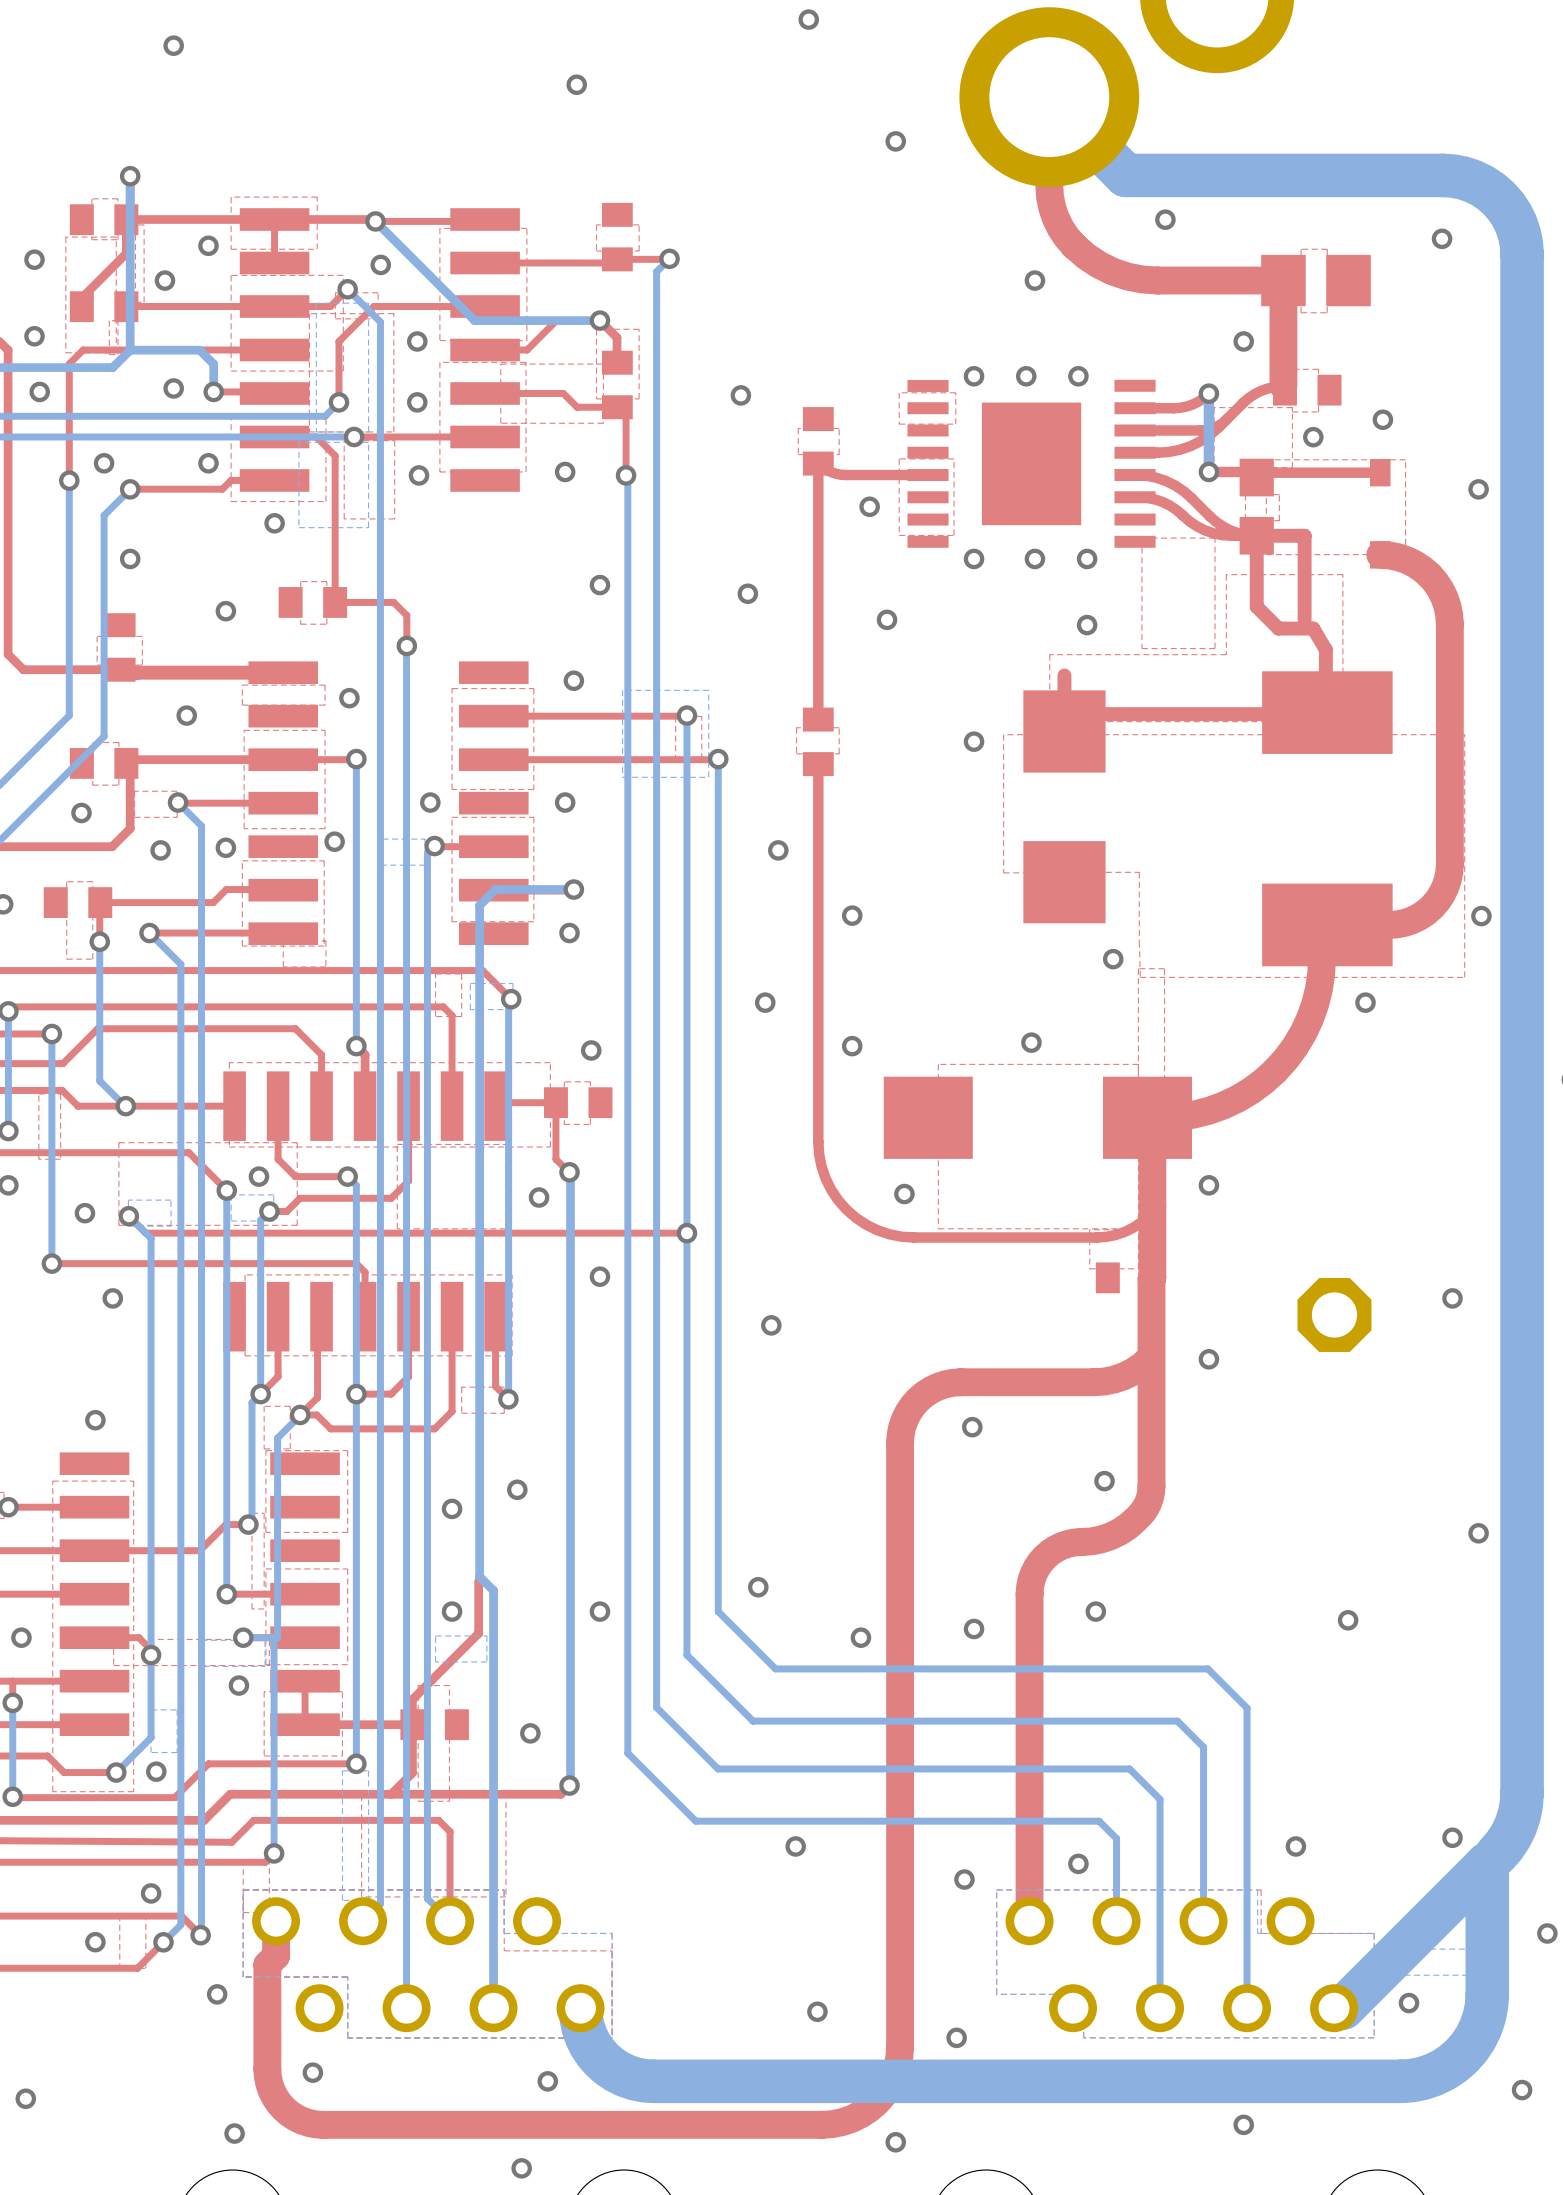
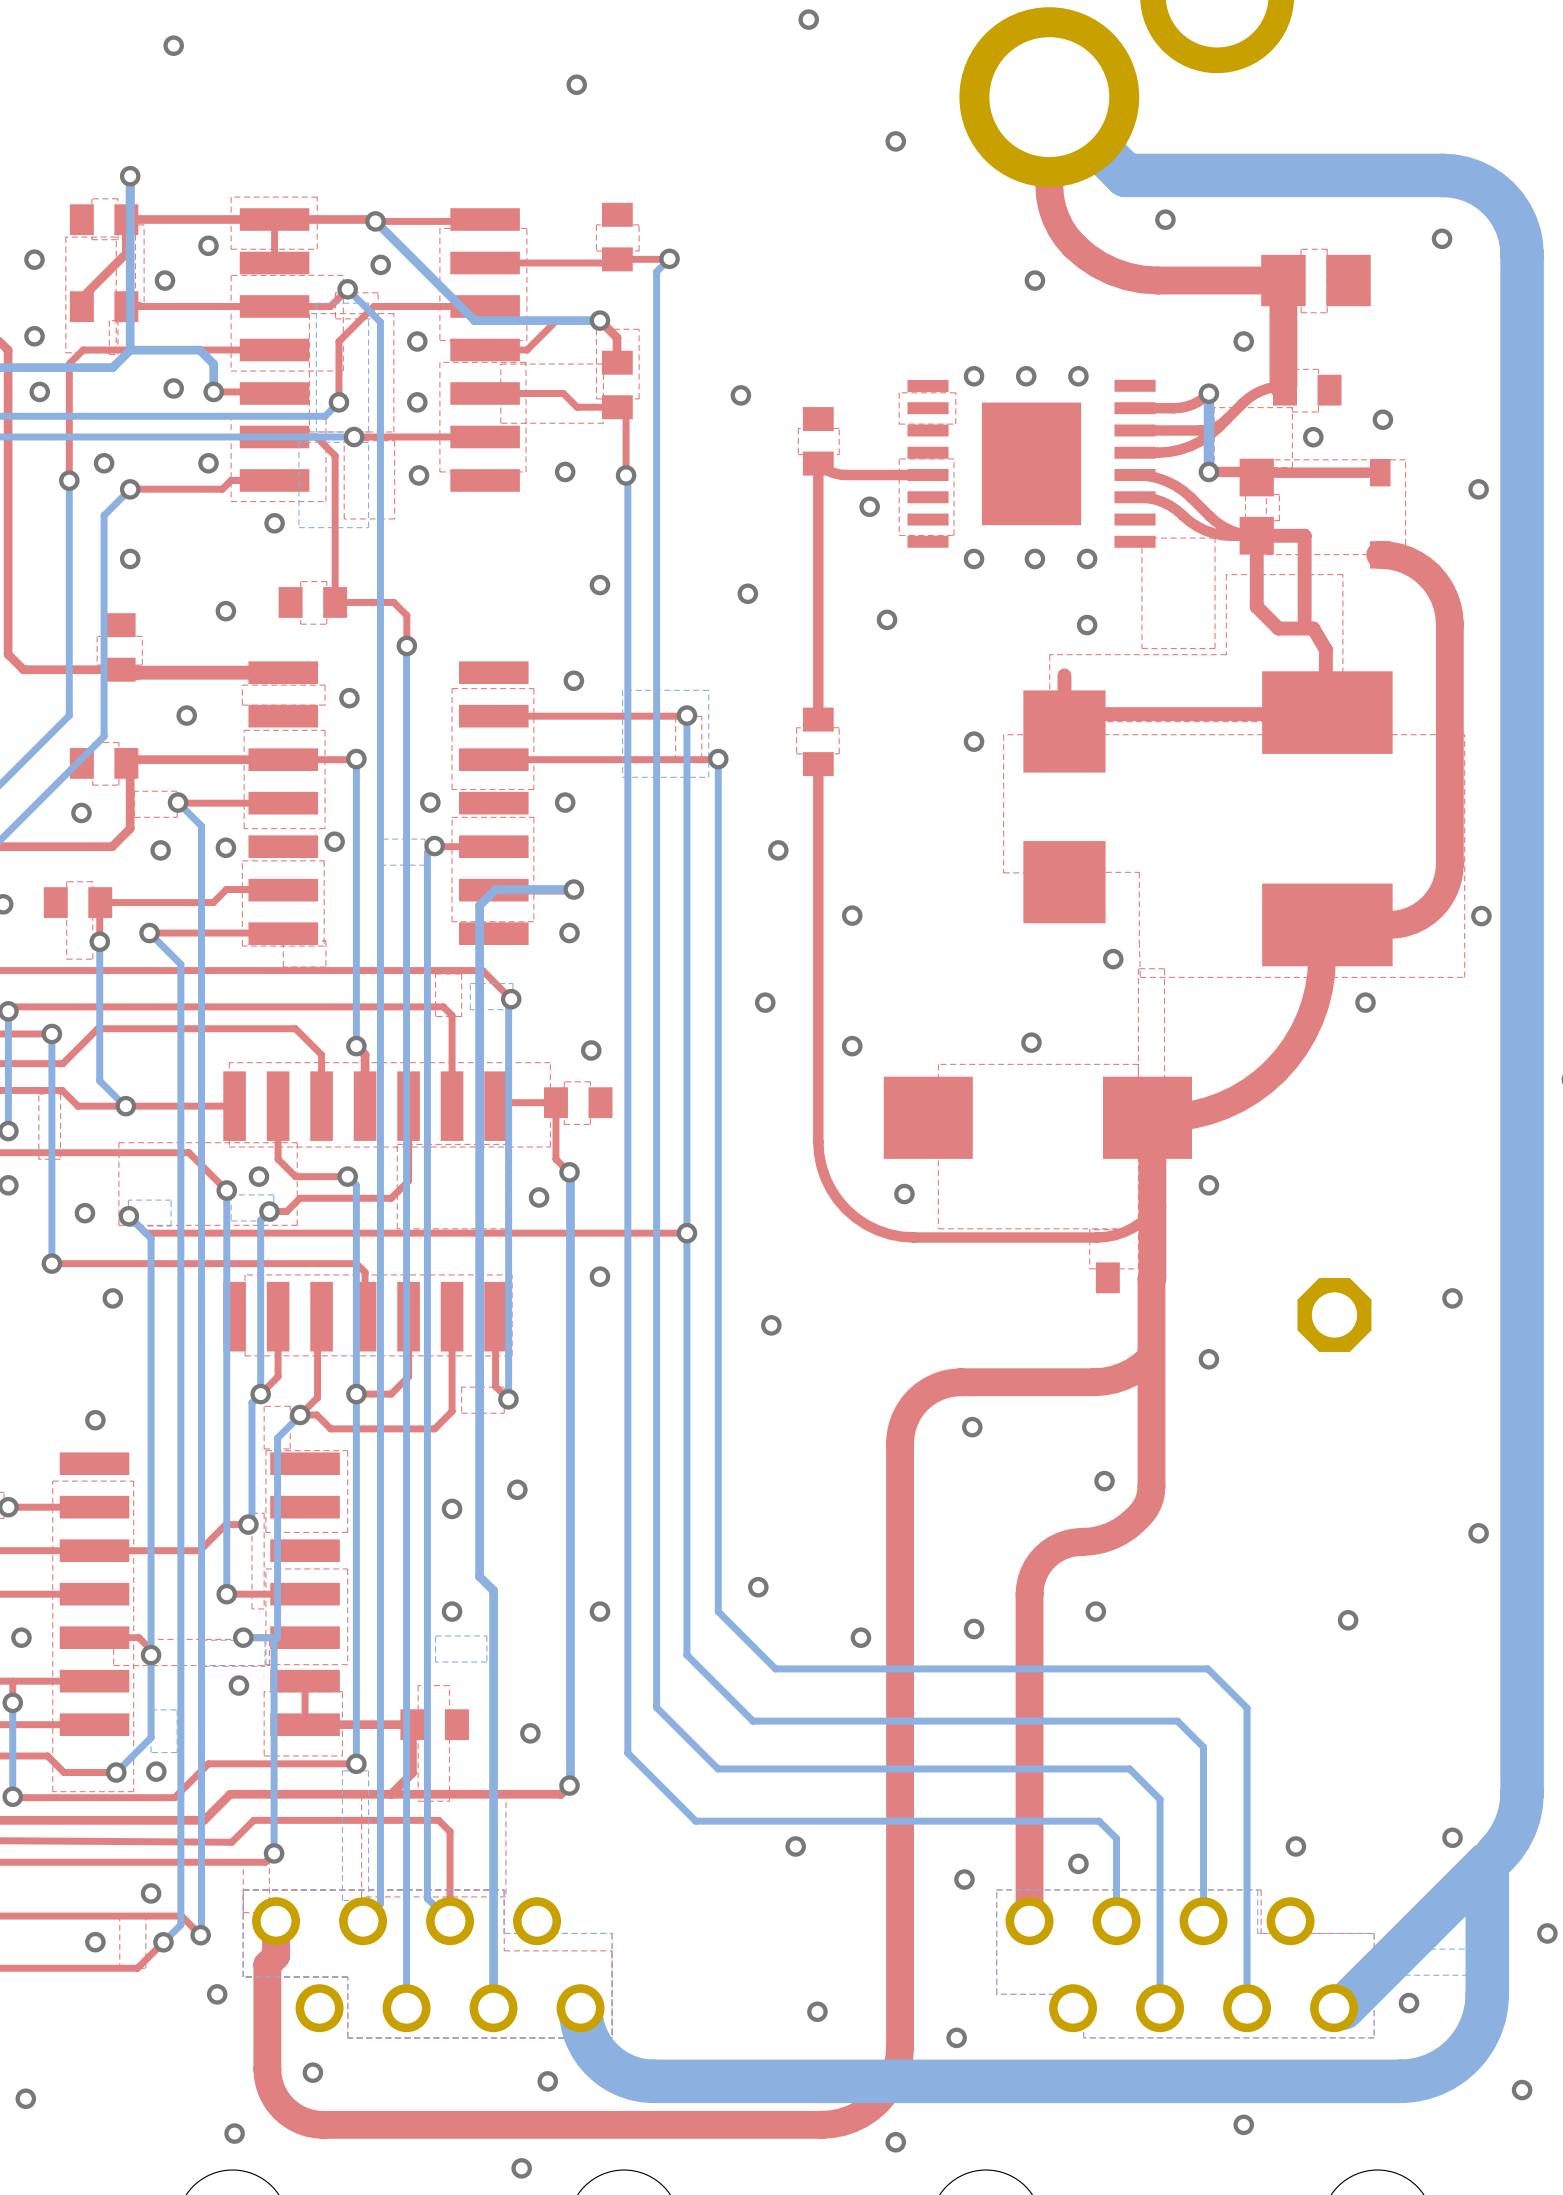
top track: (478, 1581) (478, 1633) (412, 1699) (412, 1724) -> none

